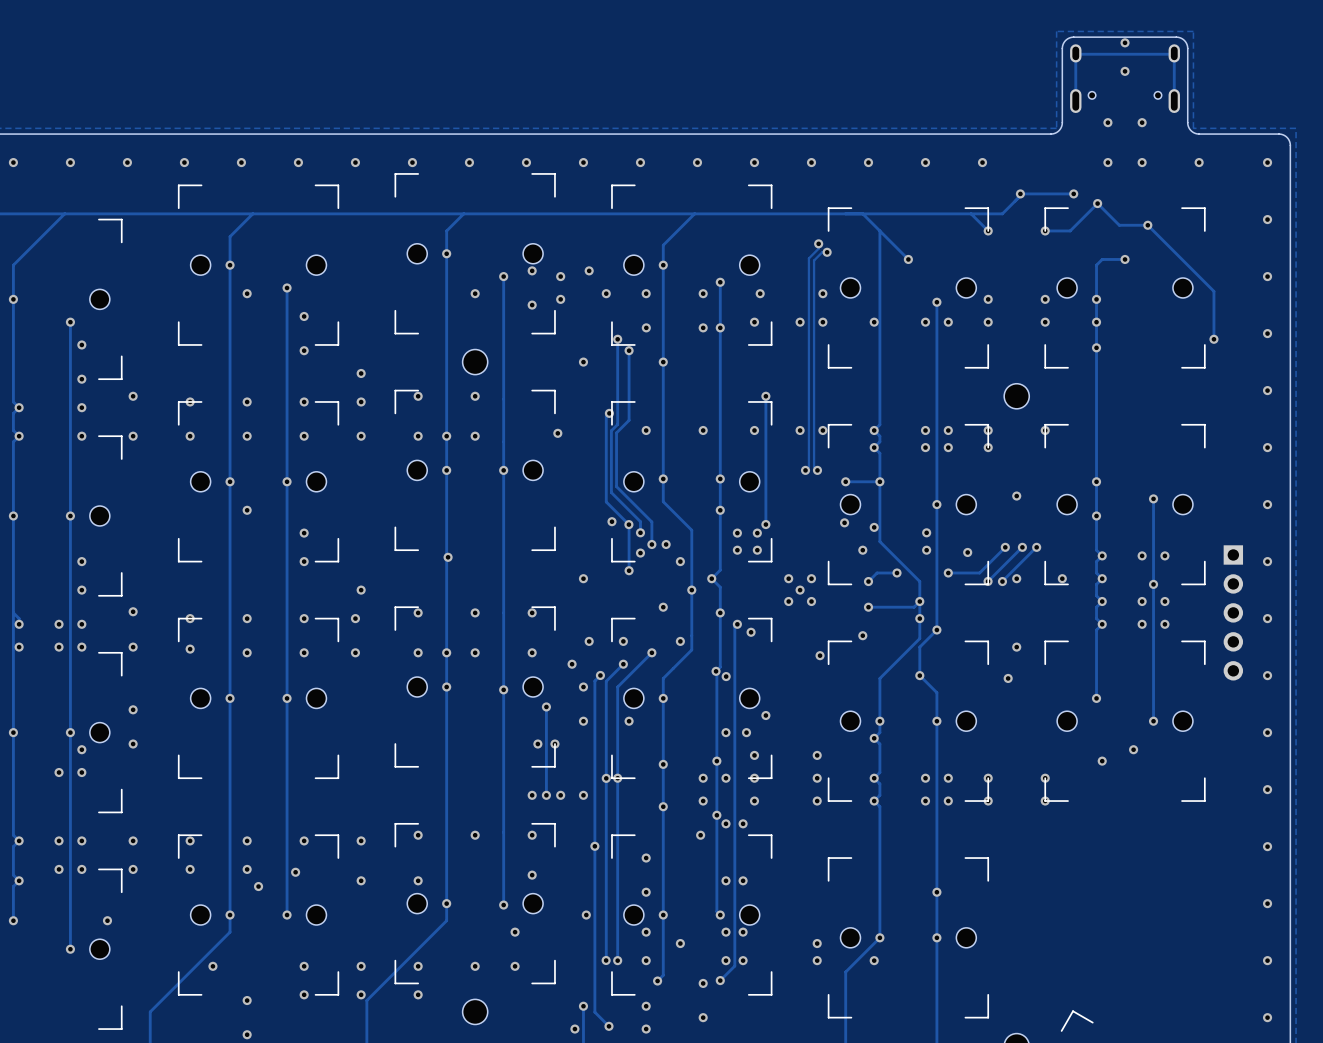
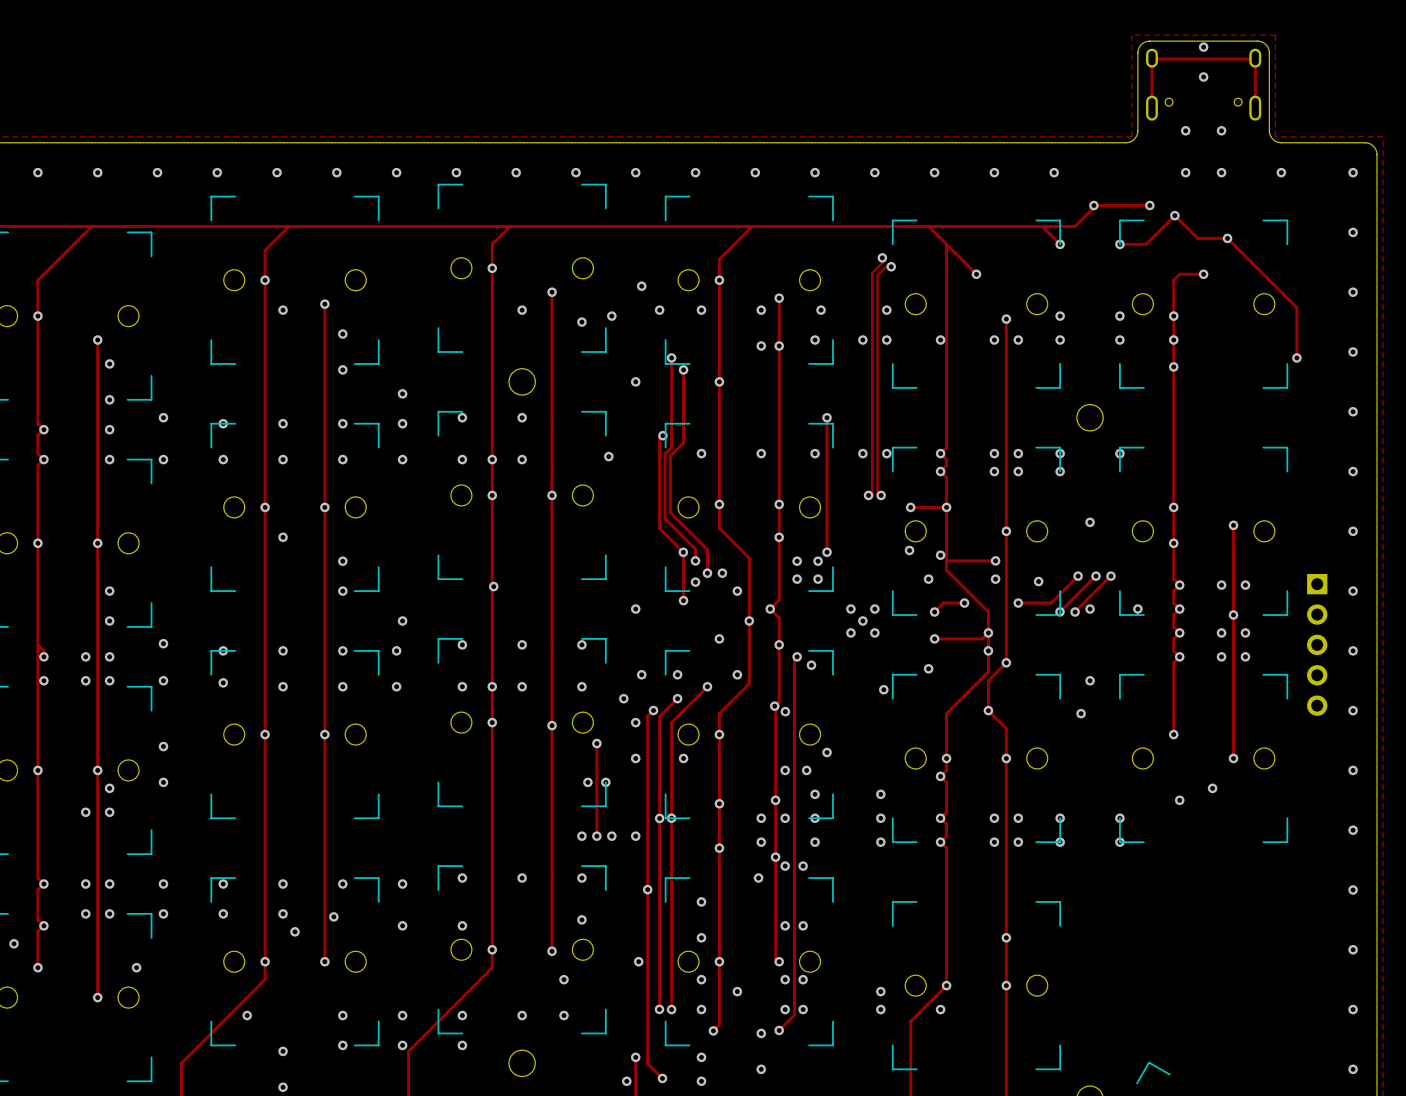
via: (532, 270) -> none
via: (560, 276) -> none
via: (646, 327) -> none
via: (611, 521) -> none
track: none -> (995, 560) (946, 561)

